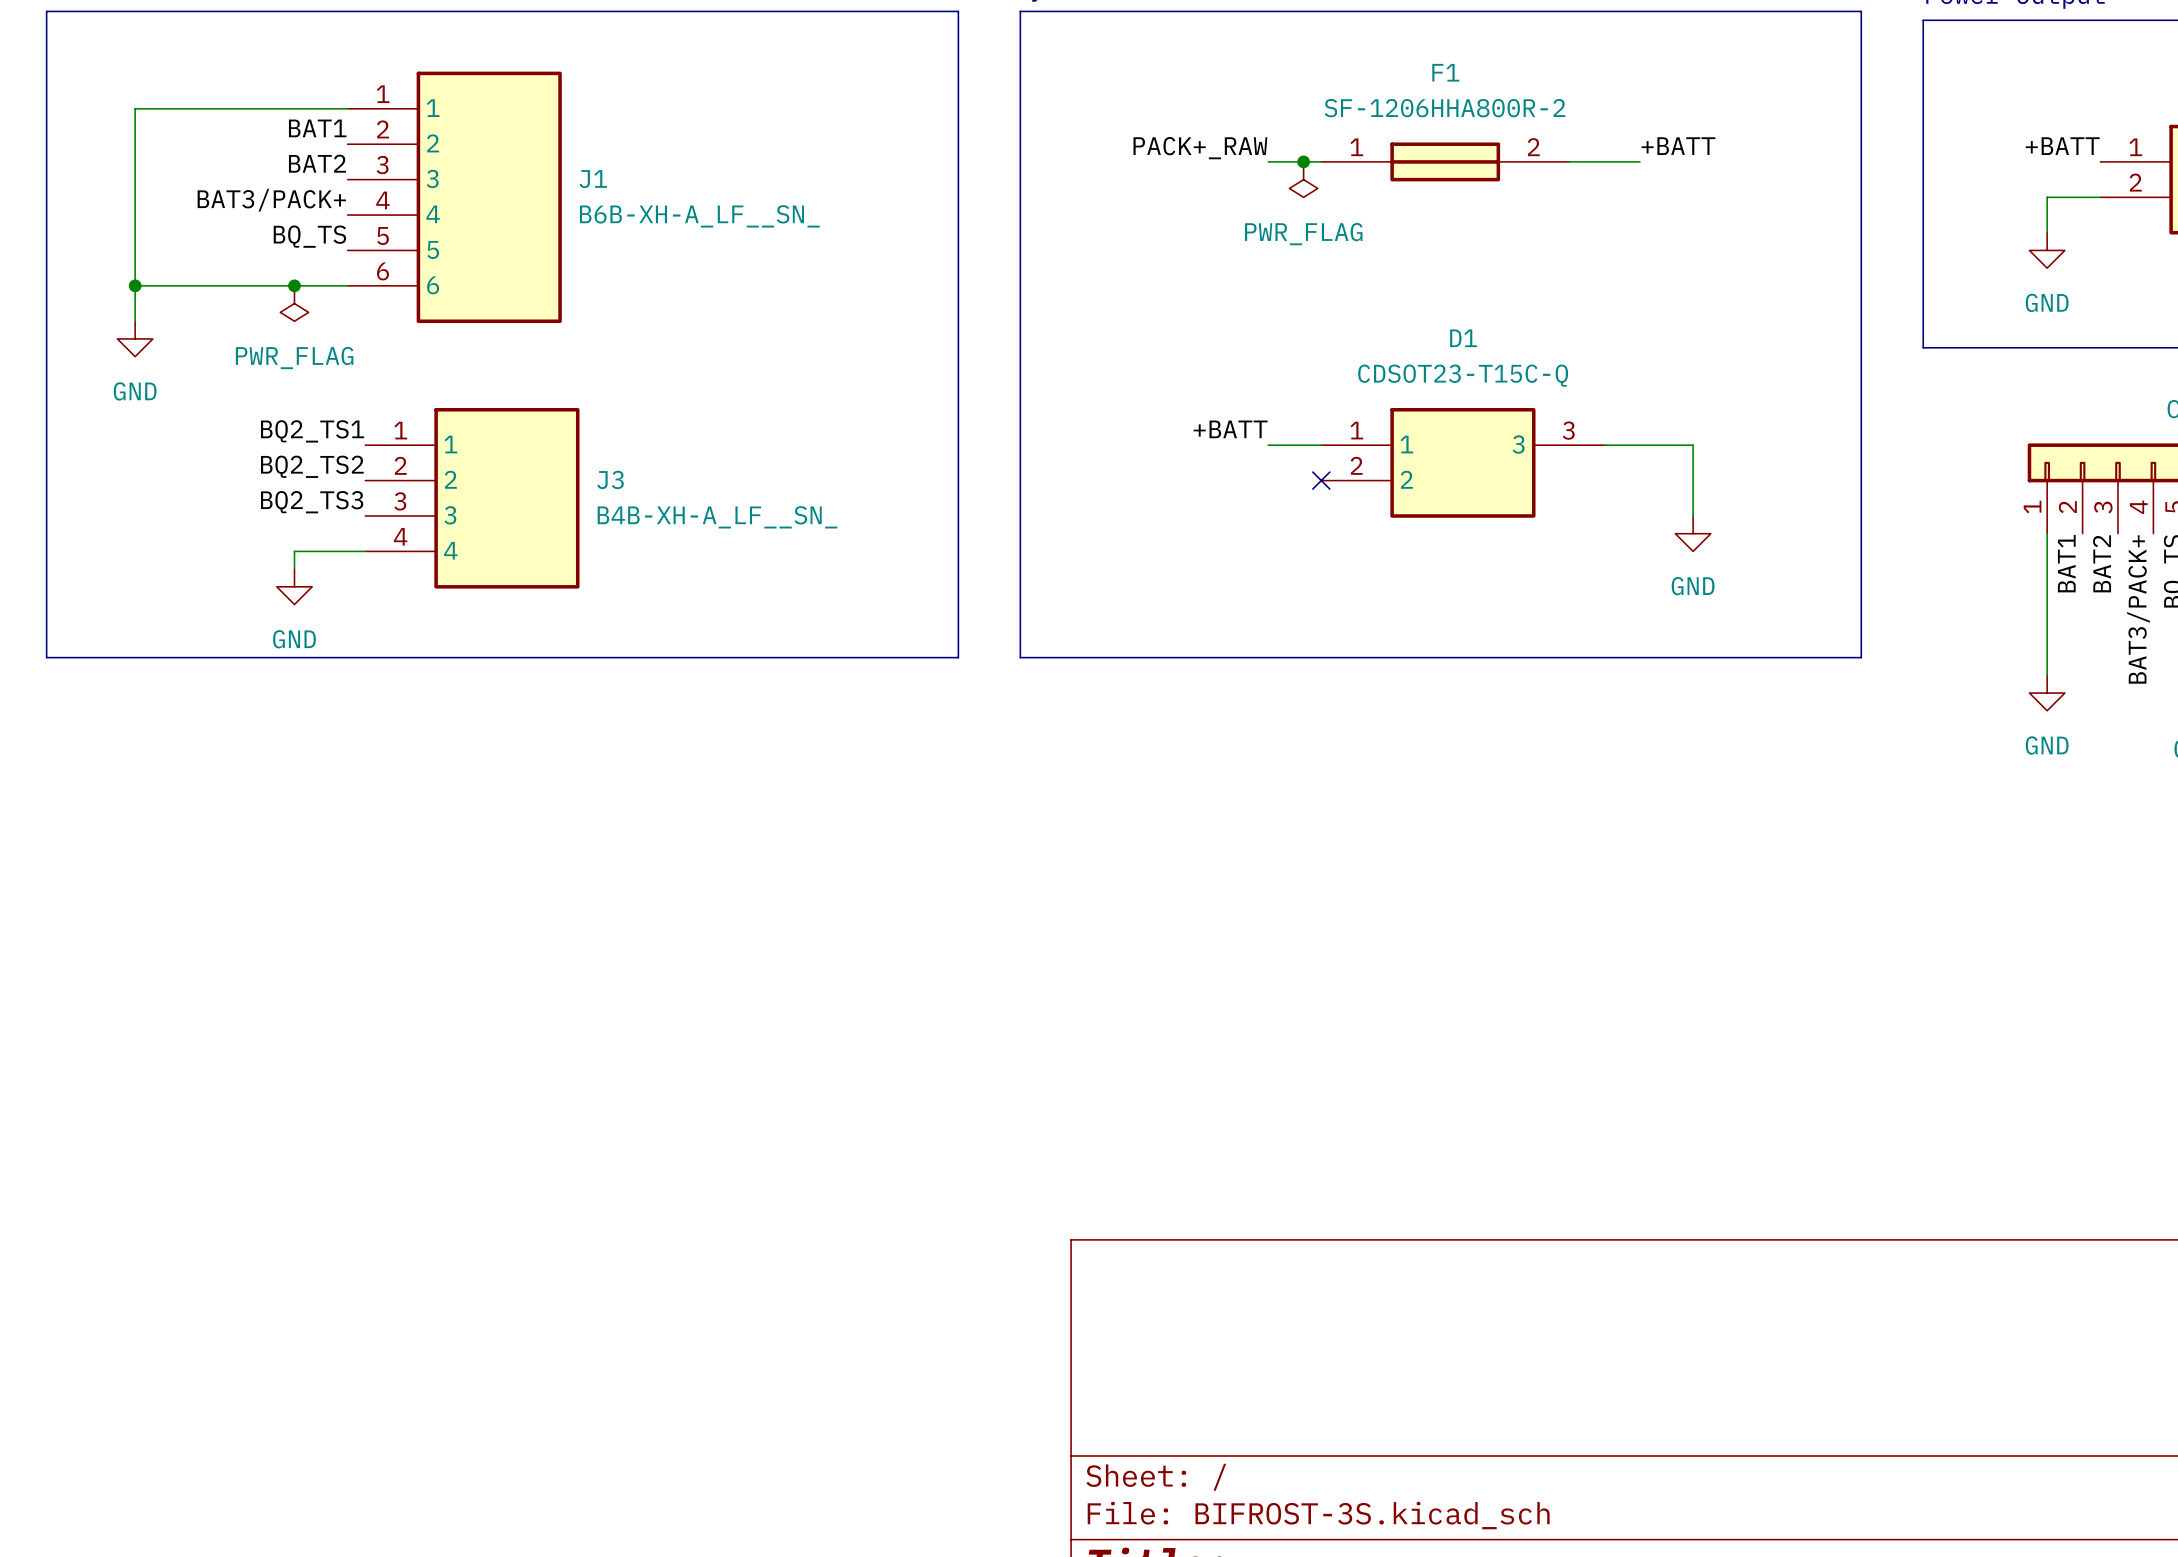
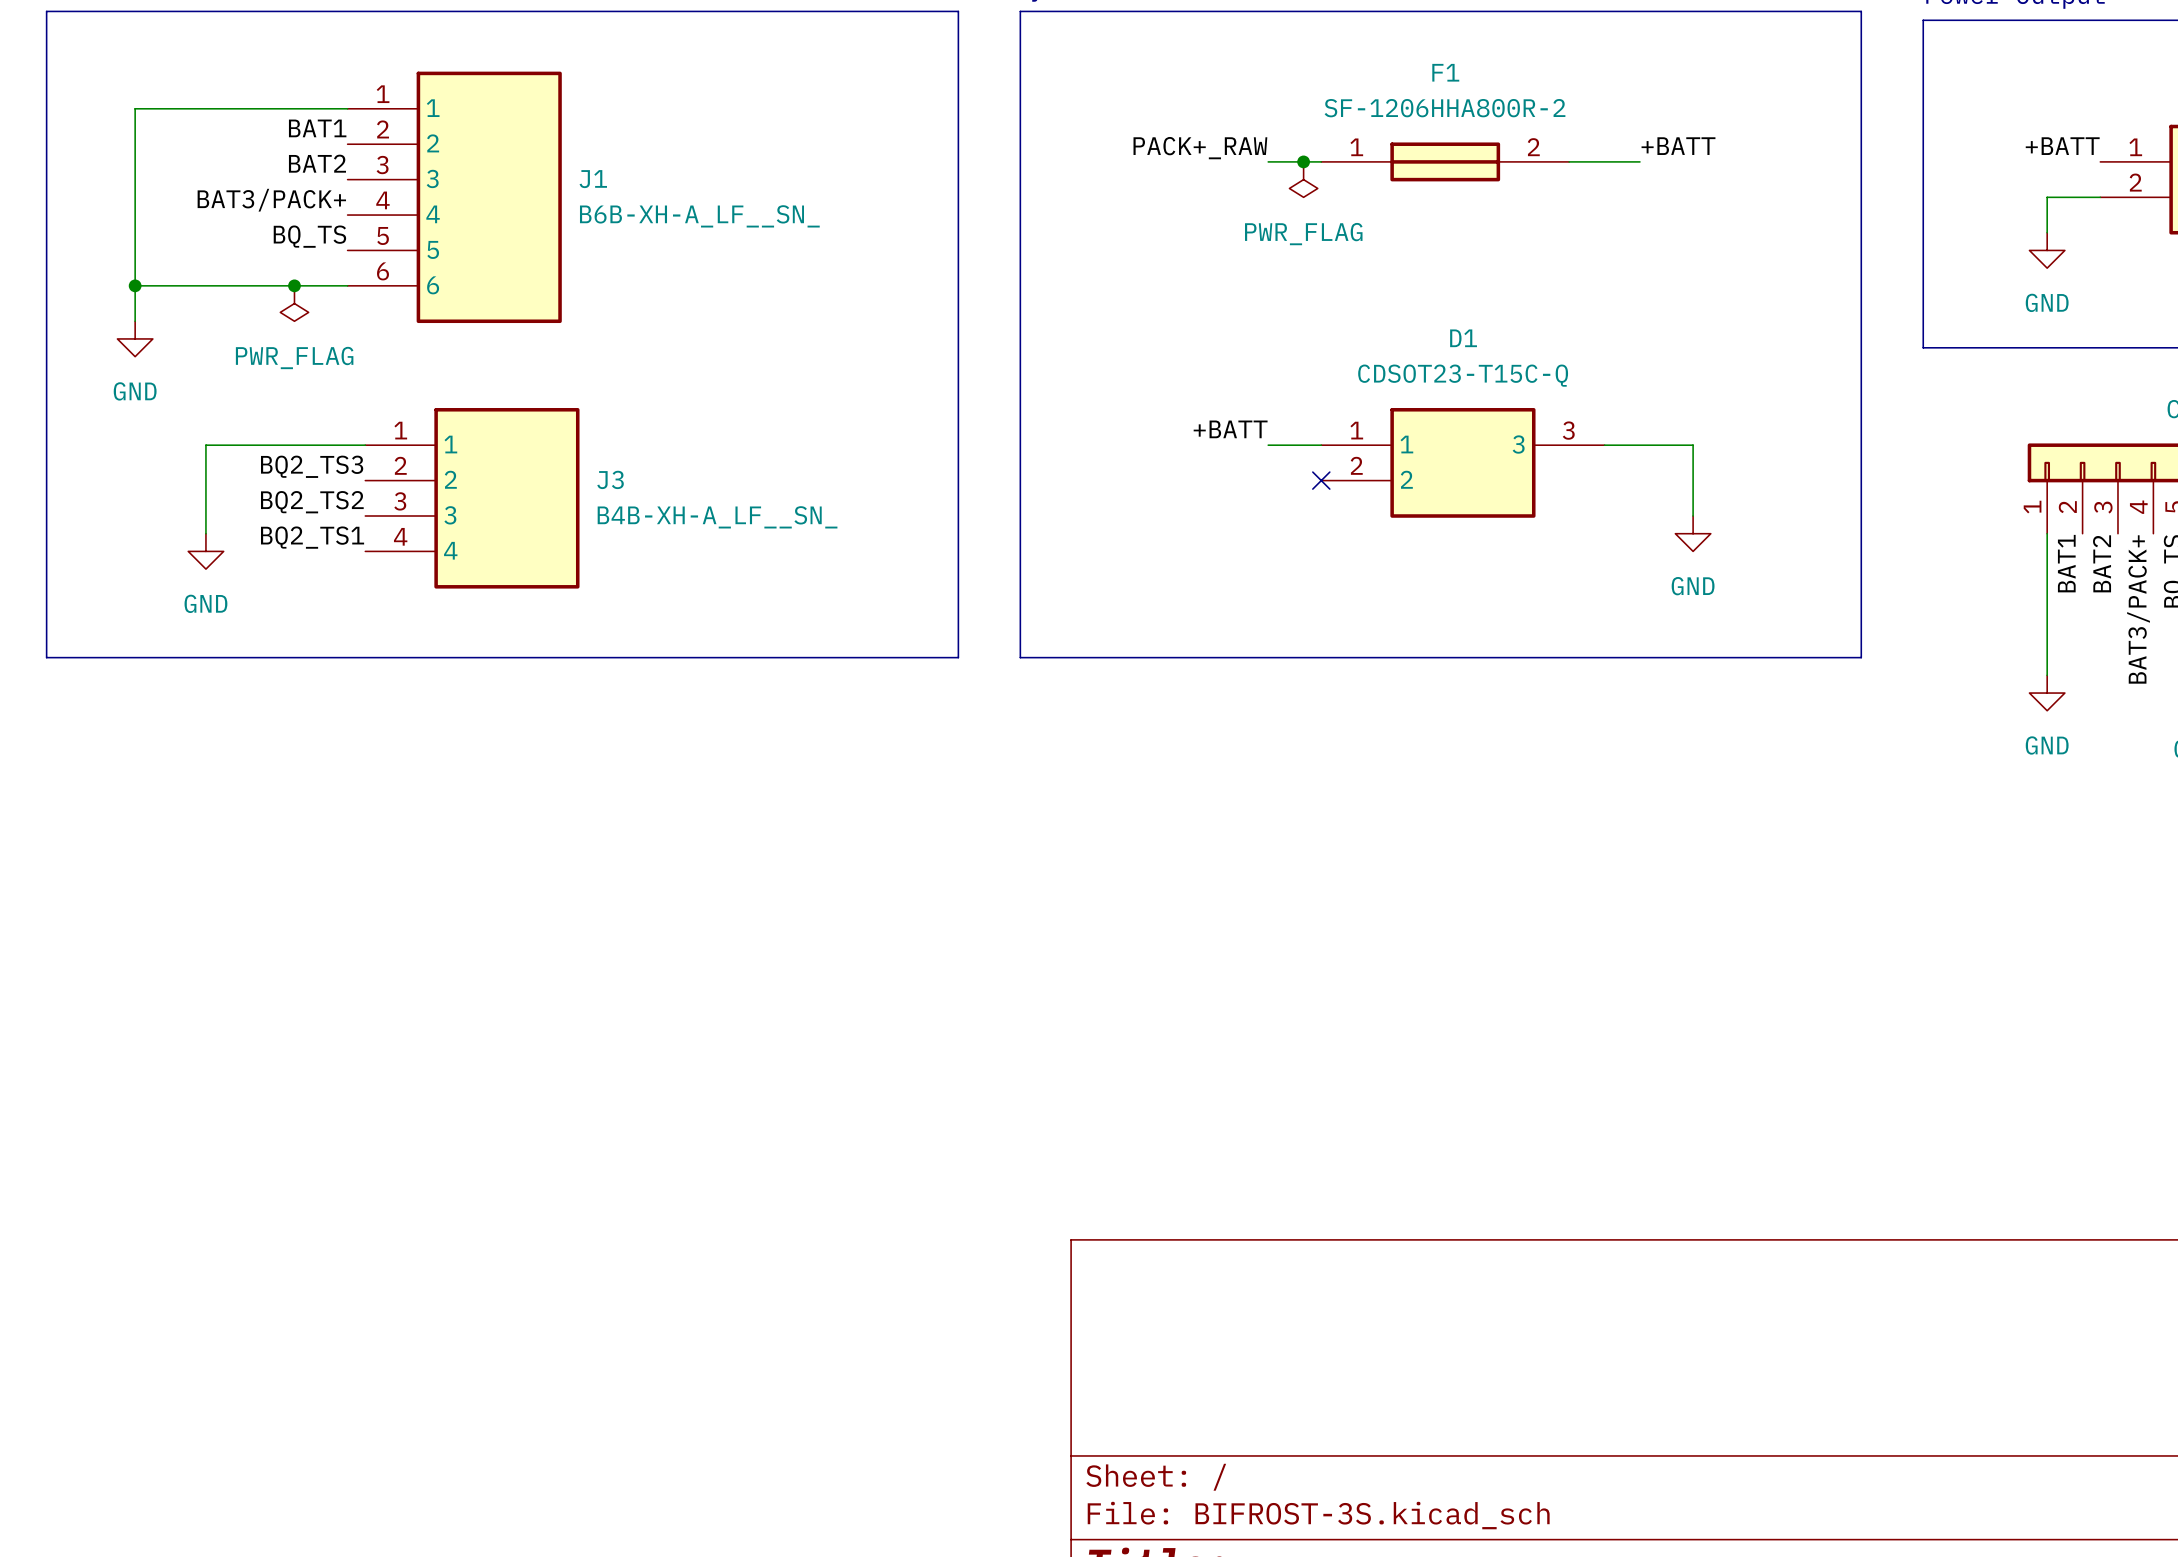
label position: BQ2_TS1 (312, 431) -> BQ2_TS1 (312, 537)
wire: none -> (365, 445) (205, 445) (205, 533)
label: BQ2_TS2 (312, 466) -> BQ2_TS3 (312, 466)
label: BQ2_TS3 (312, 502) -> BQ2_TS2 (312, 502)
wire: (365, 551) (294, 551) (294, 569) -> none
power symbol position: GND (294, 586) -> GND (205, 551)

